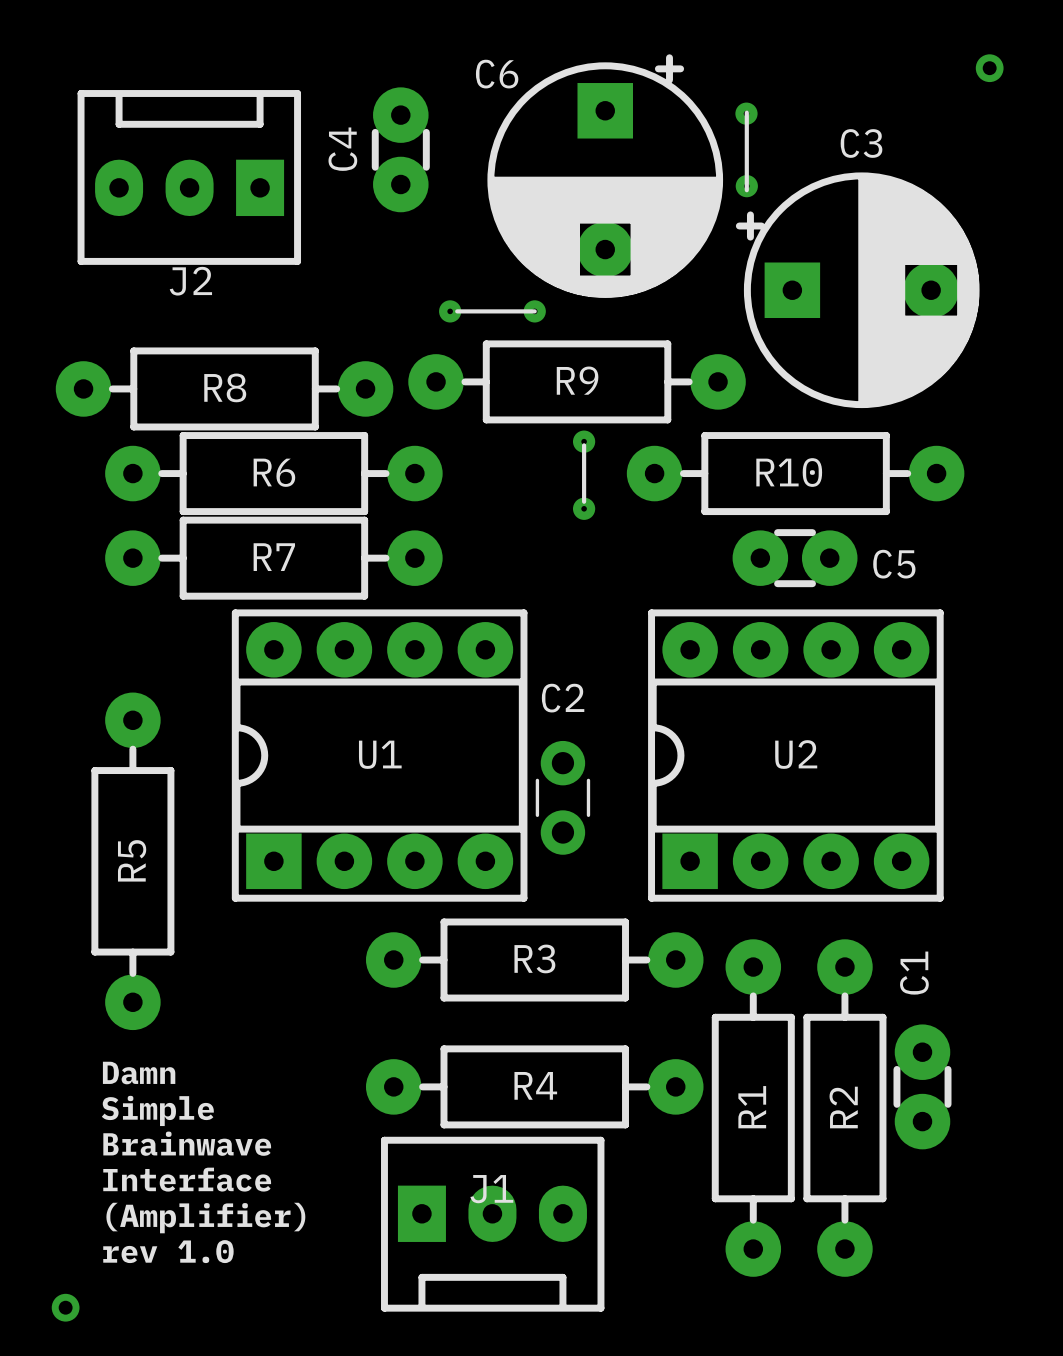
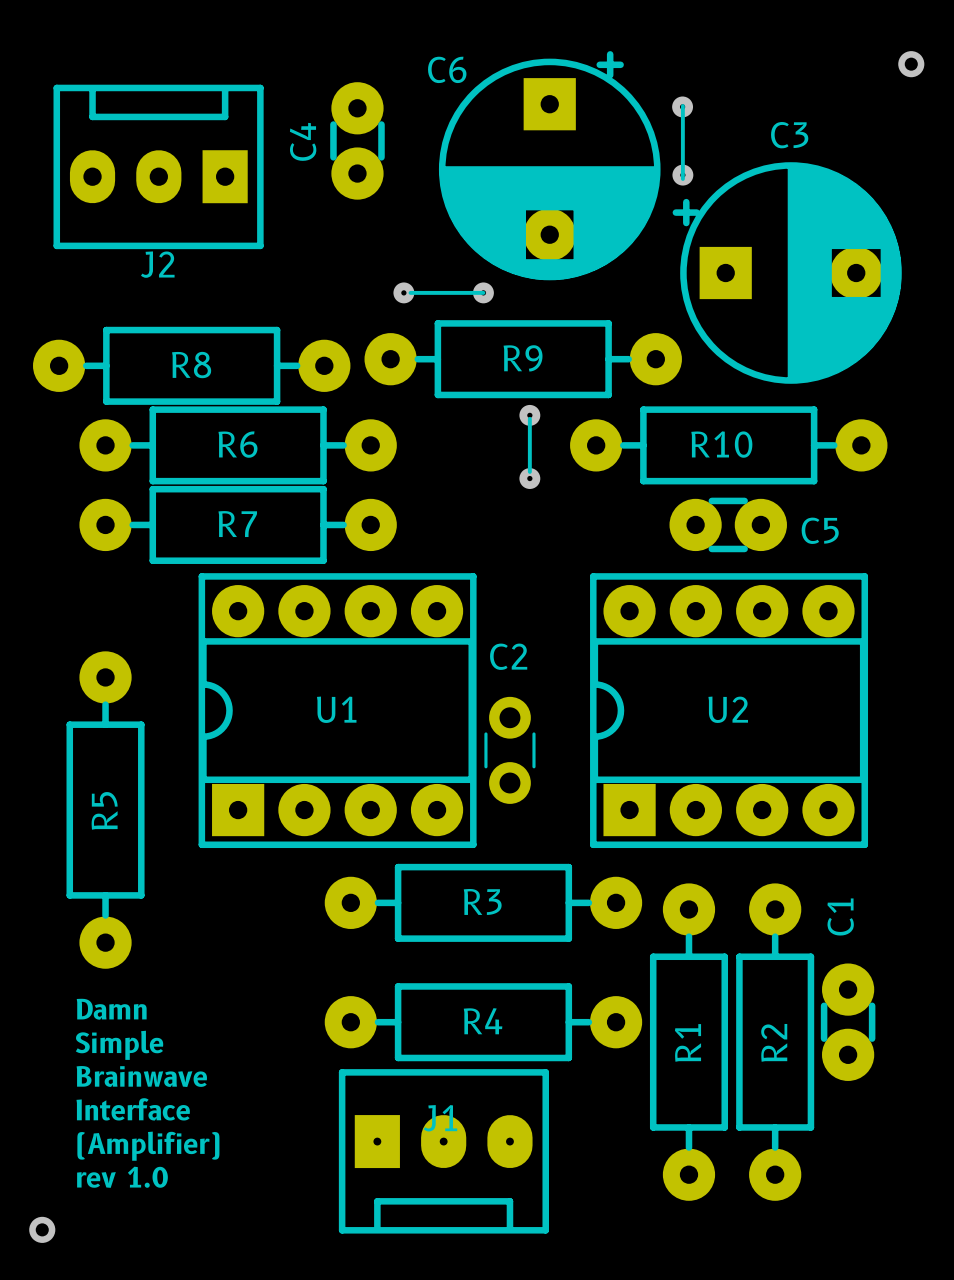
J1 footprint: [381, 1136, 605, 1312] -> [338, 1069, 549, 1234]

